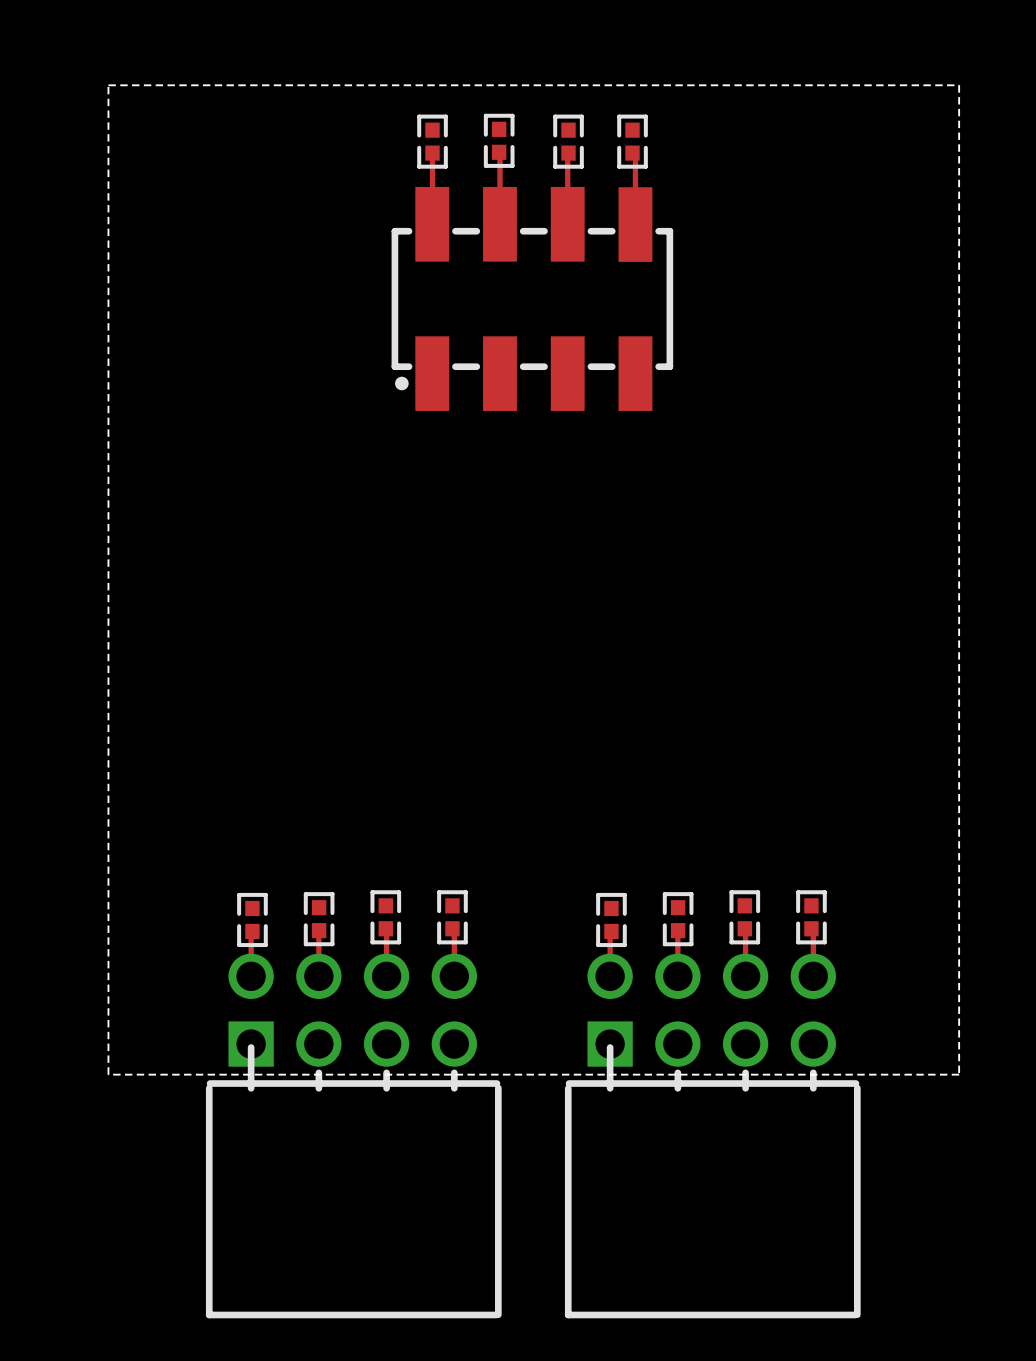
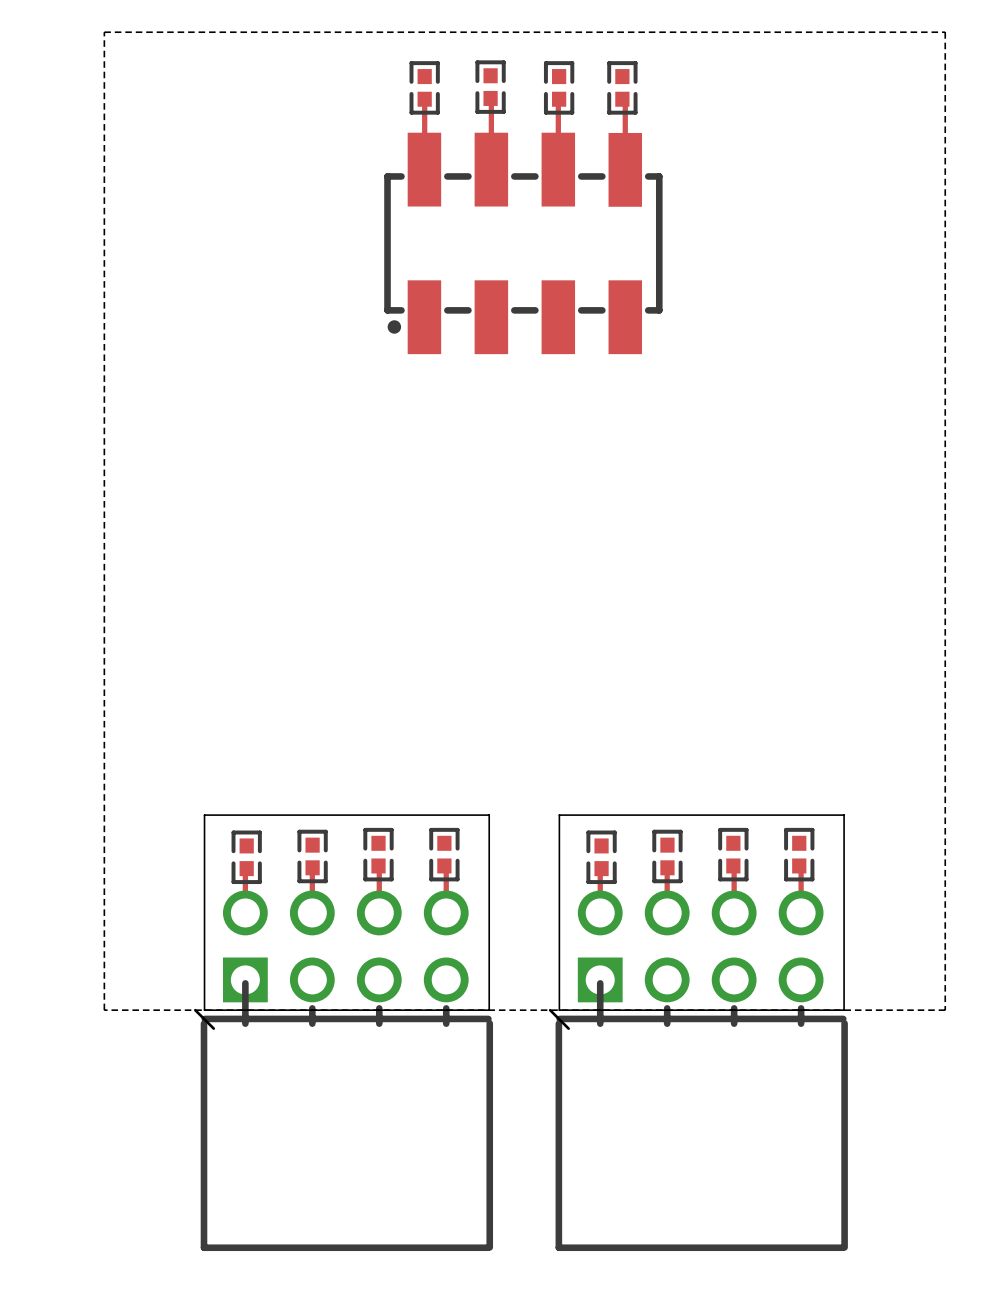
board edge: none -> (204, 815) (489, 815) (489, 1010) (204, 1010) (204, 815)
board edge: none -> (559, 815) (844, 815) (844, 1010) (559, 1010) (559, 815)
board edge: none -> (195, 1010) (213, 1028)
board edge: none -> (550, 1010) (568, 1028)

